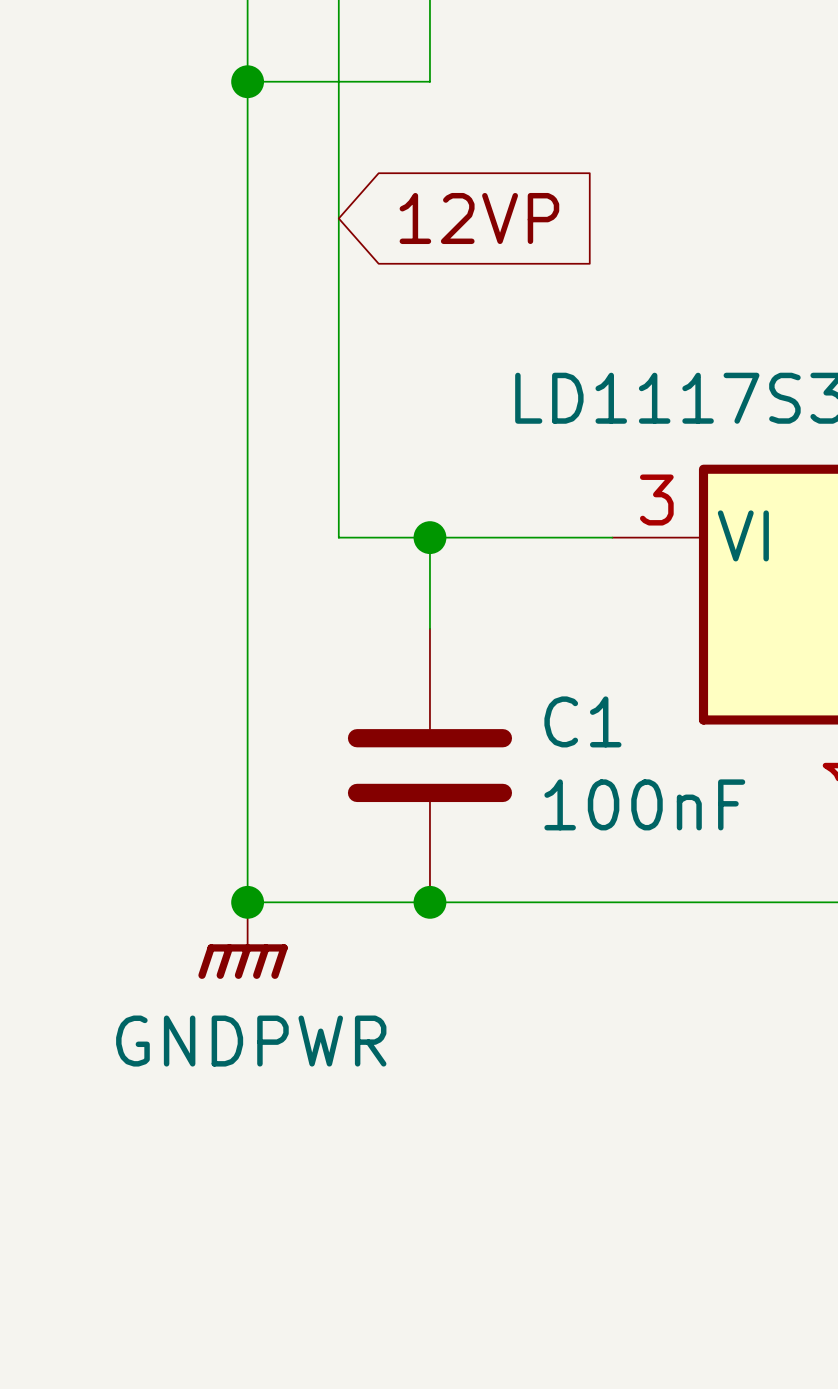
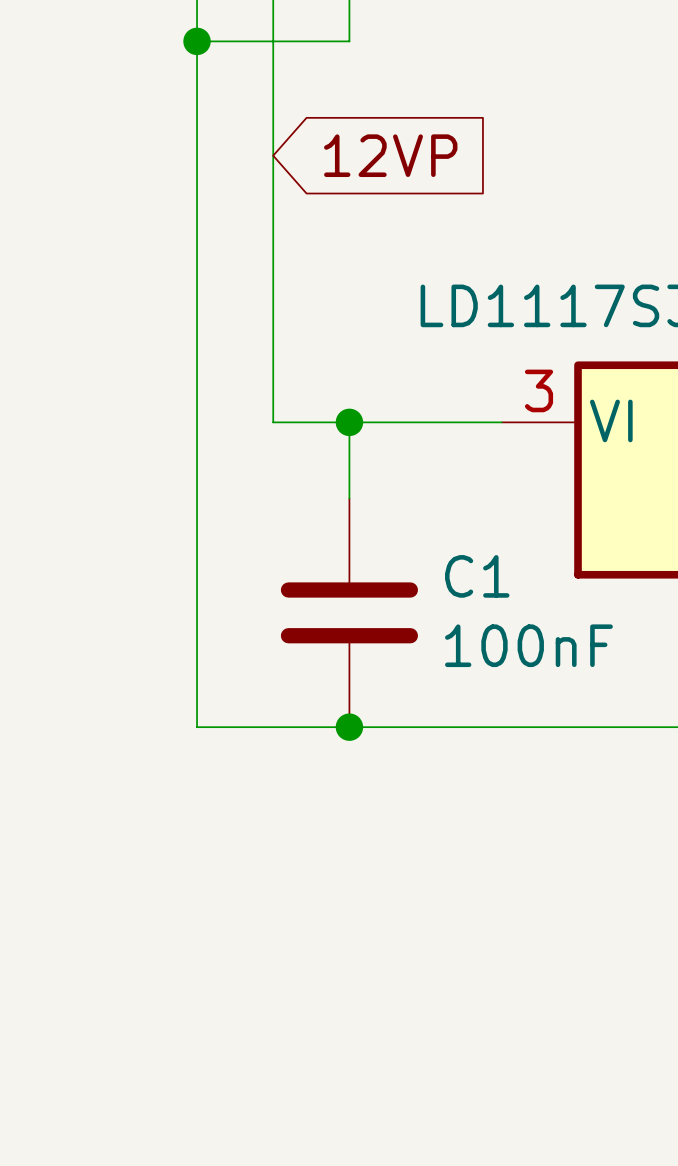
junction: (247, 902) -> none
power symbol: GNDPWR (243, 940) -> none

